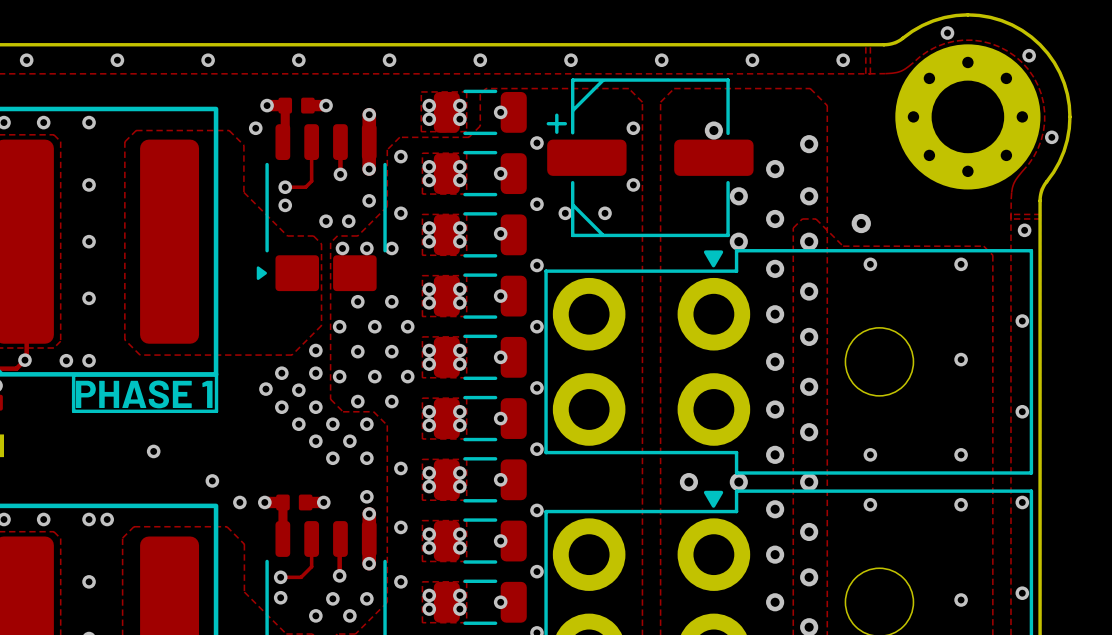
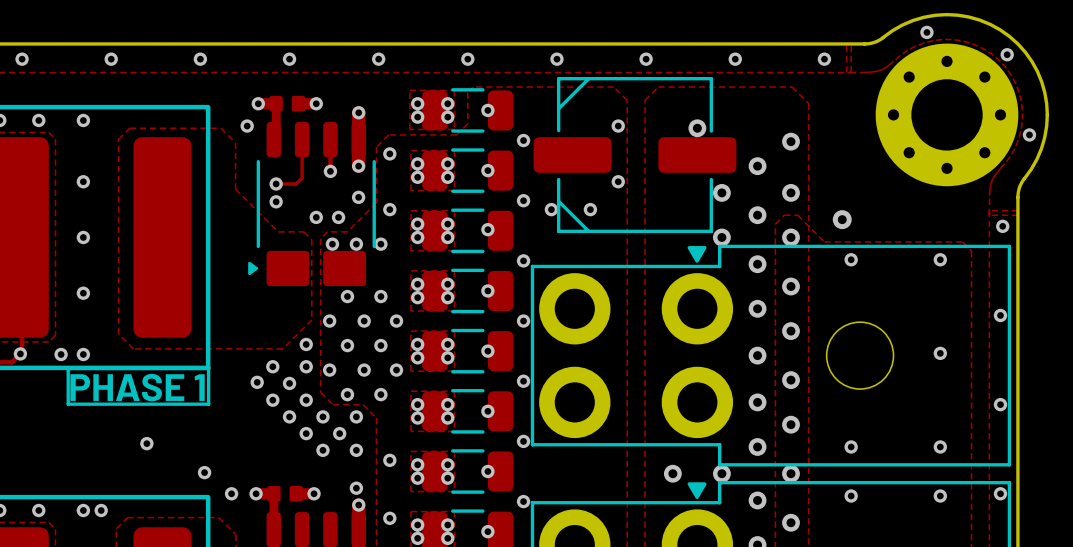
part footprint: [546, 78, 754, 238] -> [533, 77, 737, 234]

